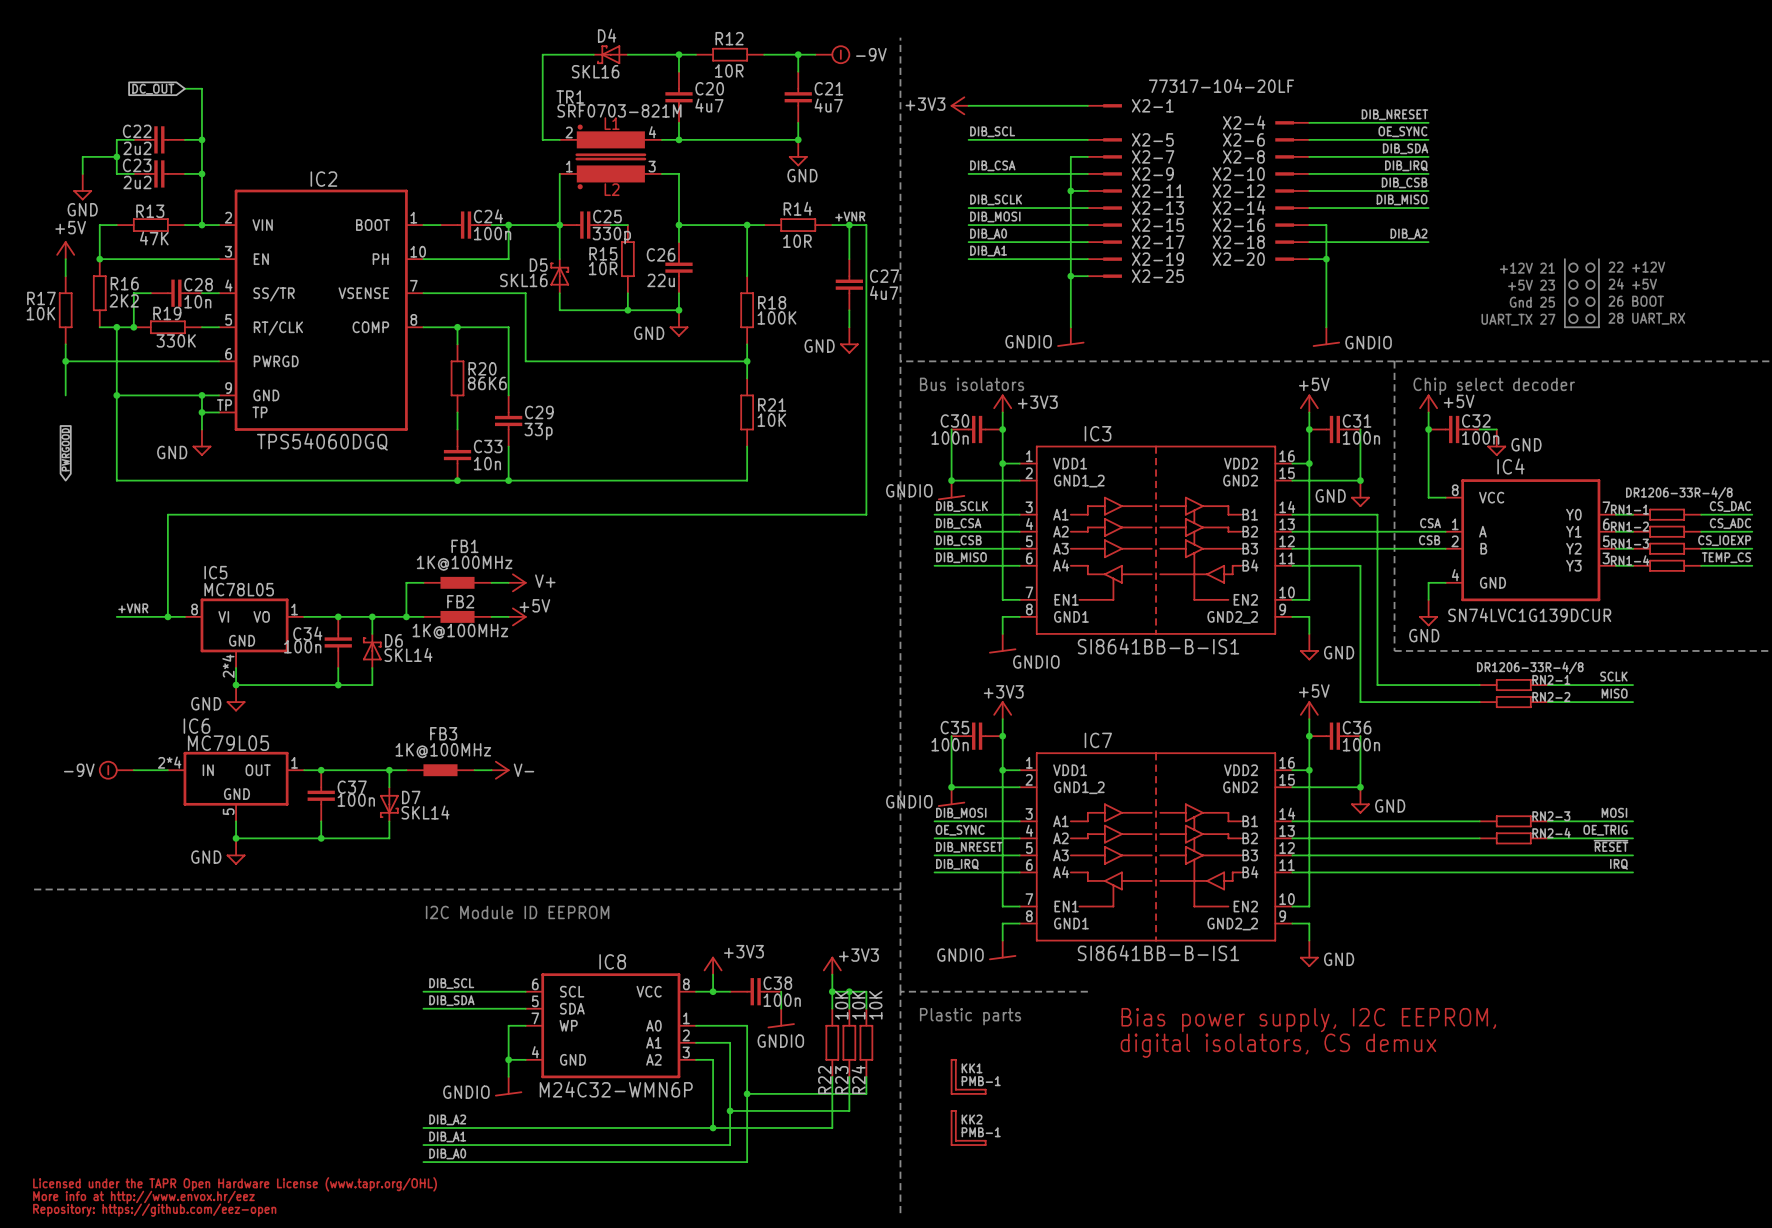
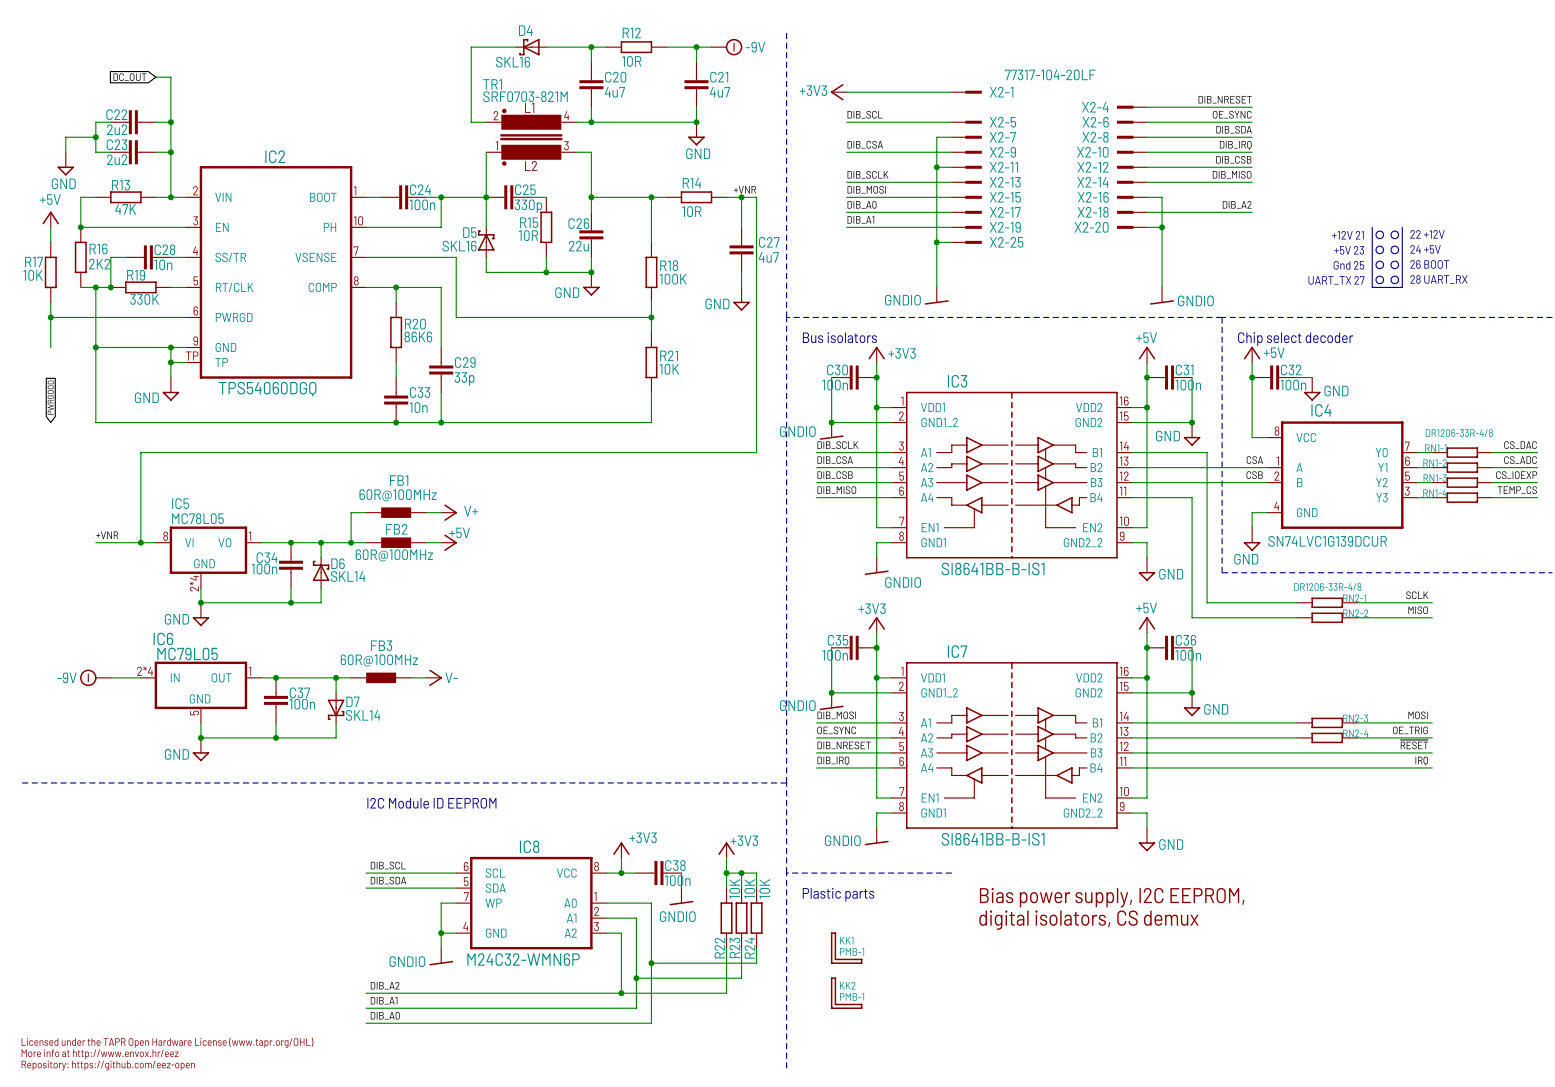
FB1 value: 1K@100MHz (464, 563) -> 60R@100MHz (398, 495)
FB2 value: 1K@100MHz (460, 631) -> 60R@100MHz (394, 555)
FB3 value: 1K@100MHz (443, 750) -> 60R@100MHz (379, 660)

